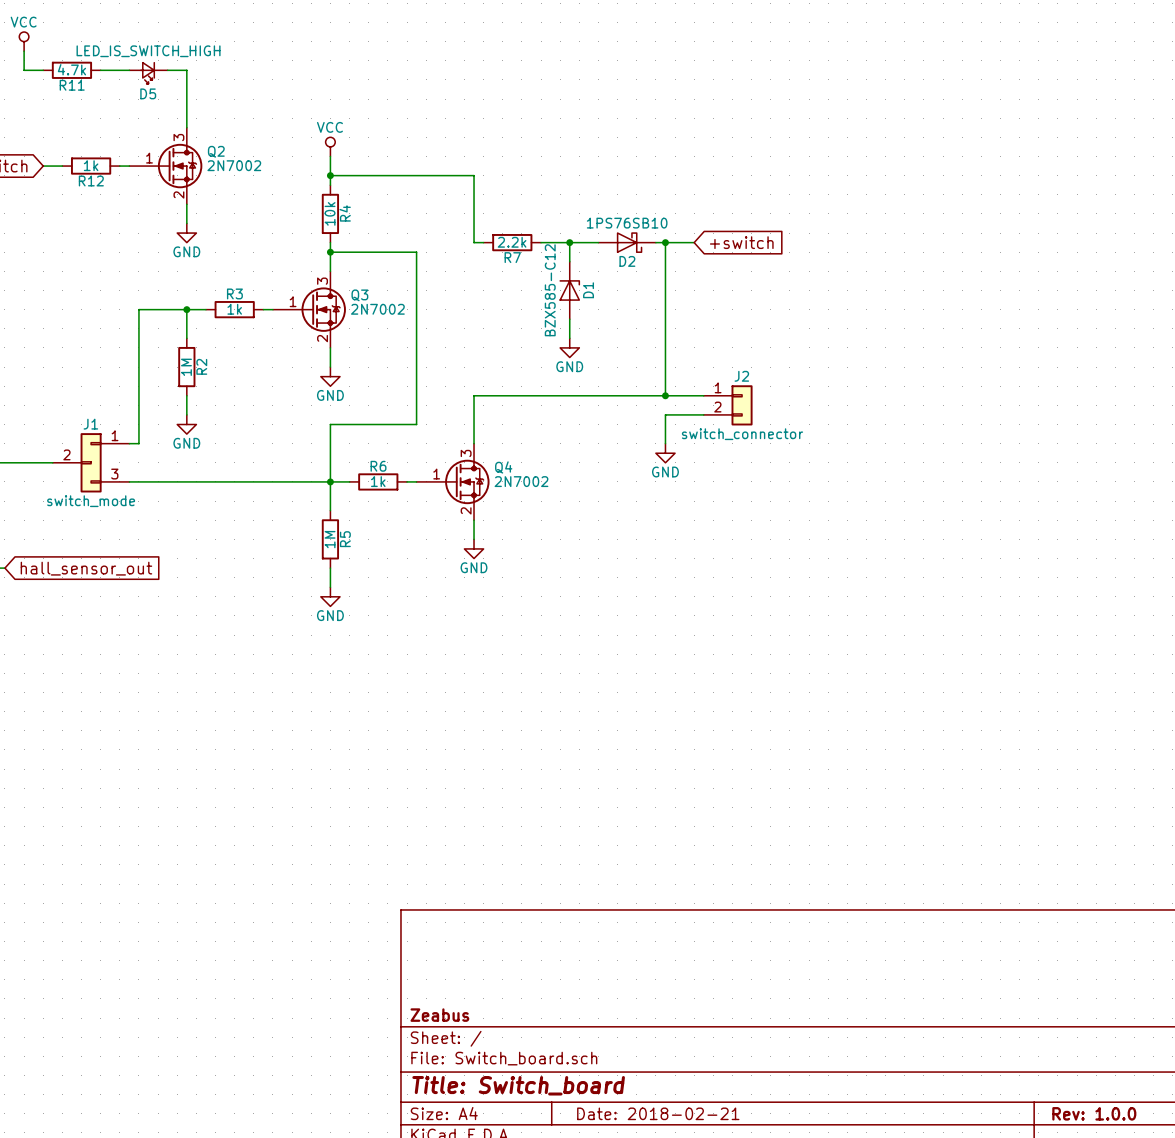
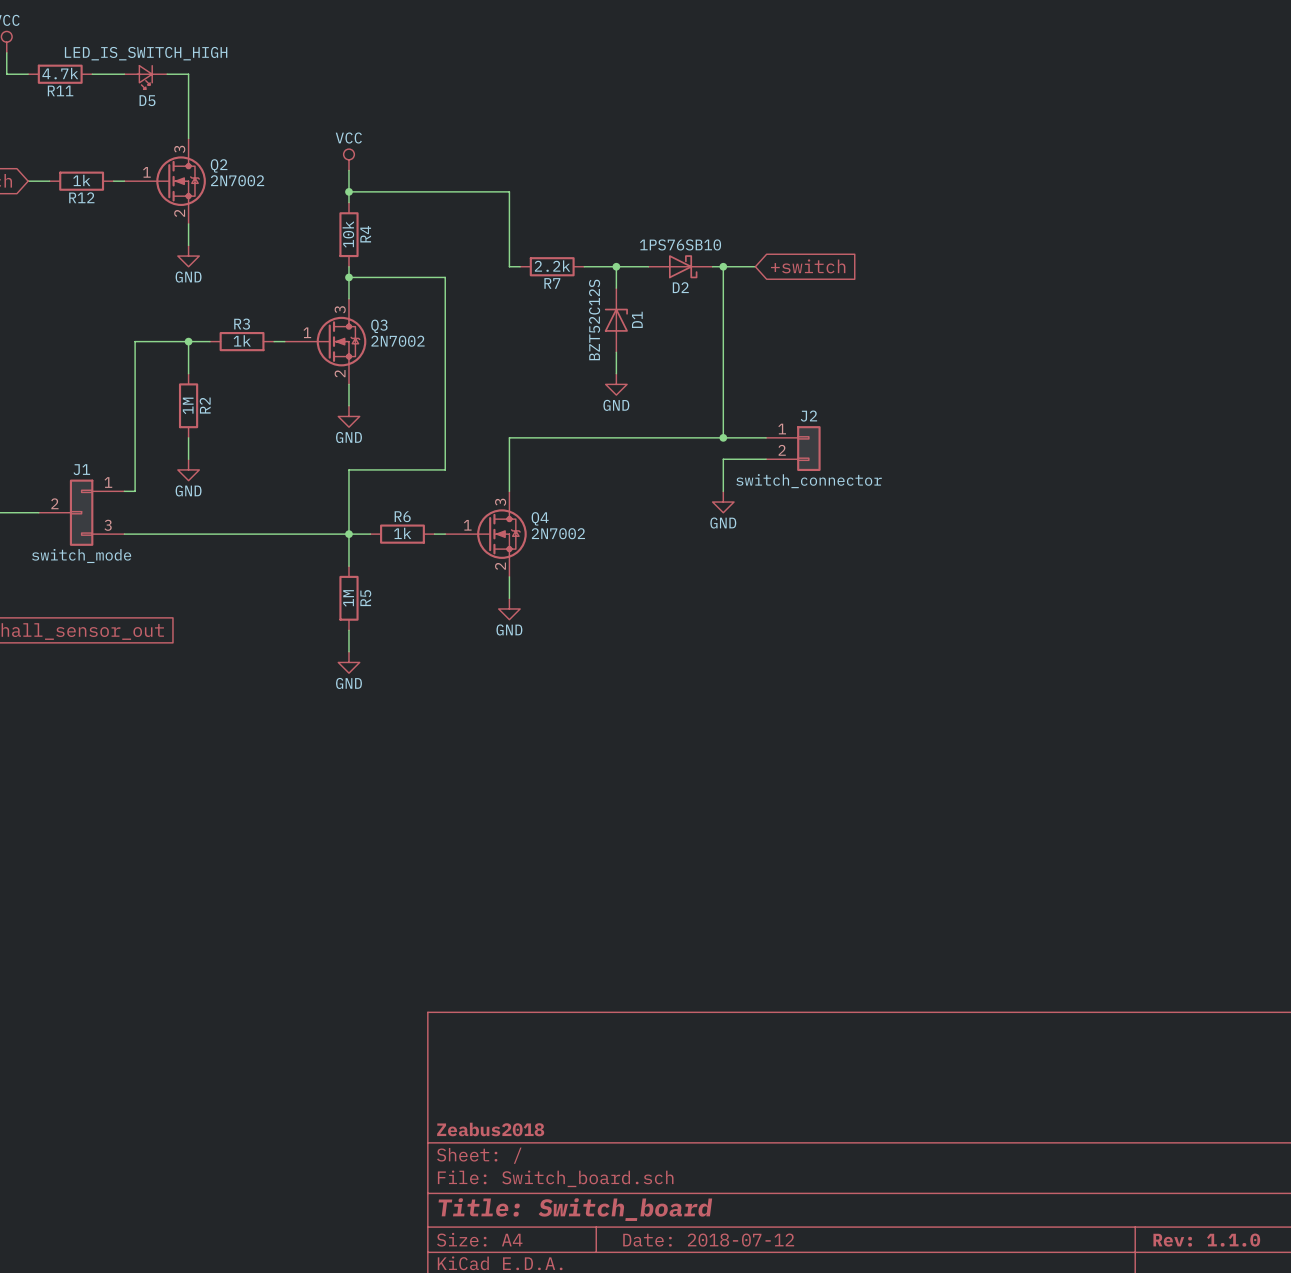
D1 value: BZX585-C12 (550, 290) -> BZT52C12S (594, 319)
title block: Zeabus (439, 1015) -> Zeabus2018 (490, 1129)
title block: Date: 2018-02-21 (658, 1113) -> Date: 2018-07-12 (708, 1240)
title block: Rev: 1.0.0 (1094, 1113) -> Rev: 1.1.0 (1206, 1240)

